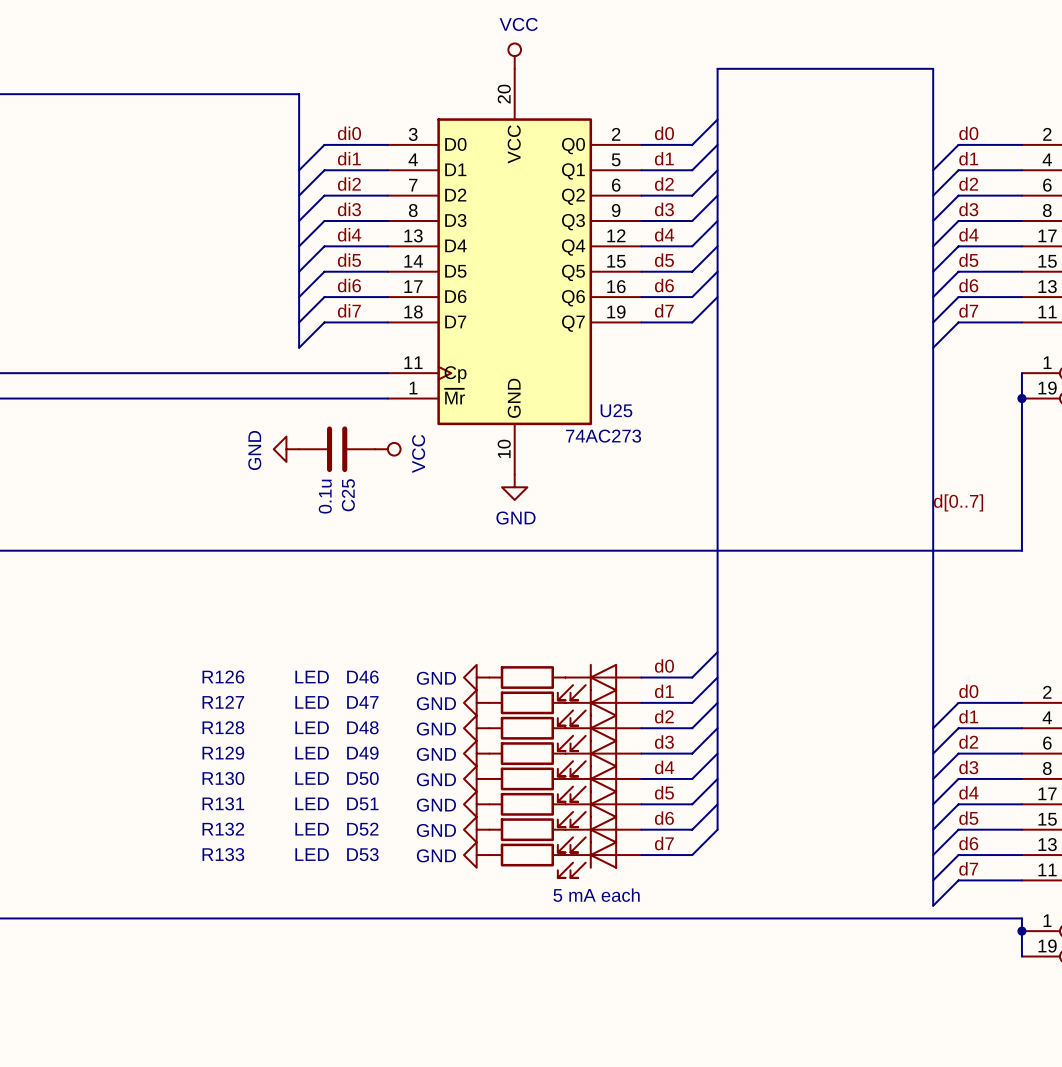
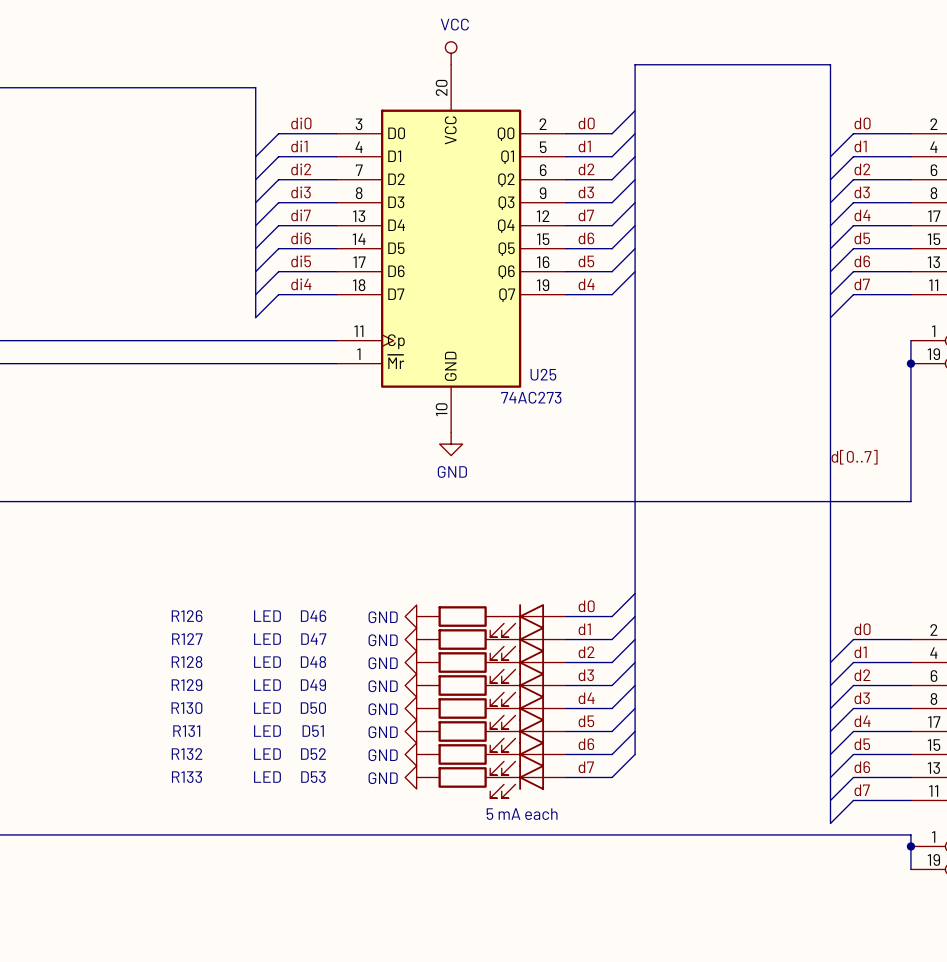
label: di4 (349, 234) -> di7 (301, 215)
label: d4 (664, 234) -> d7 (586, 215)
label: di5 (349, 260) -> di6 (301, 238)
label: d5 (664, 260) -> d6 (586, 238)
label: di6 (349, 285) -> di5 (301, 261)
label: d6 (664, 285) -> d5 (586, 261)
label: di7 (349, 310) -> di4 (301, 284)
label: d7 (664, 310) -> d4 (586, 284)
power symbol: GND (286, 449) -> none
C25: 0.1u (337, 449) -> none
power symbol: VCC (387, 449) -> none

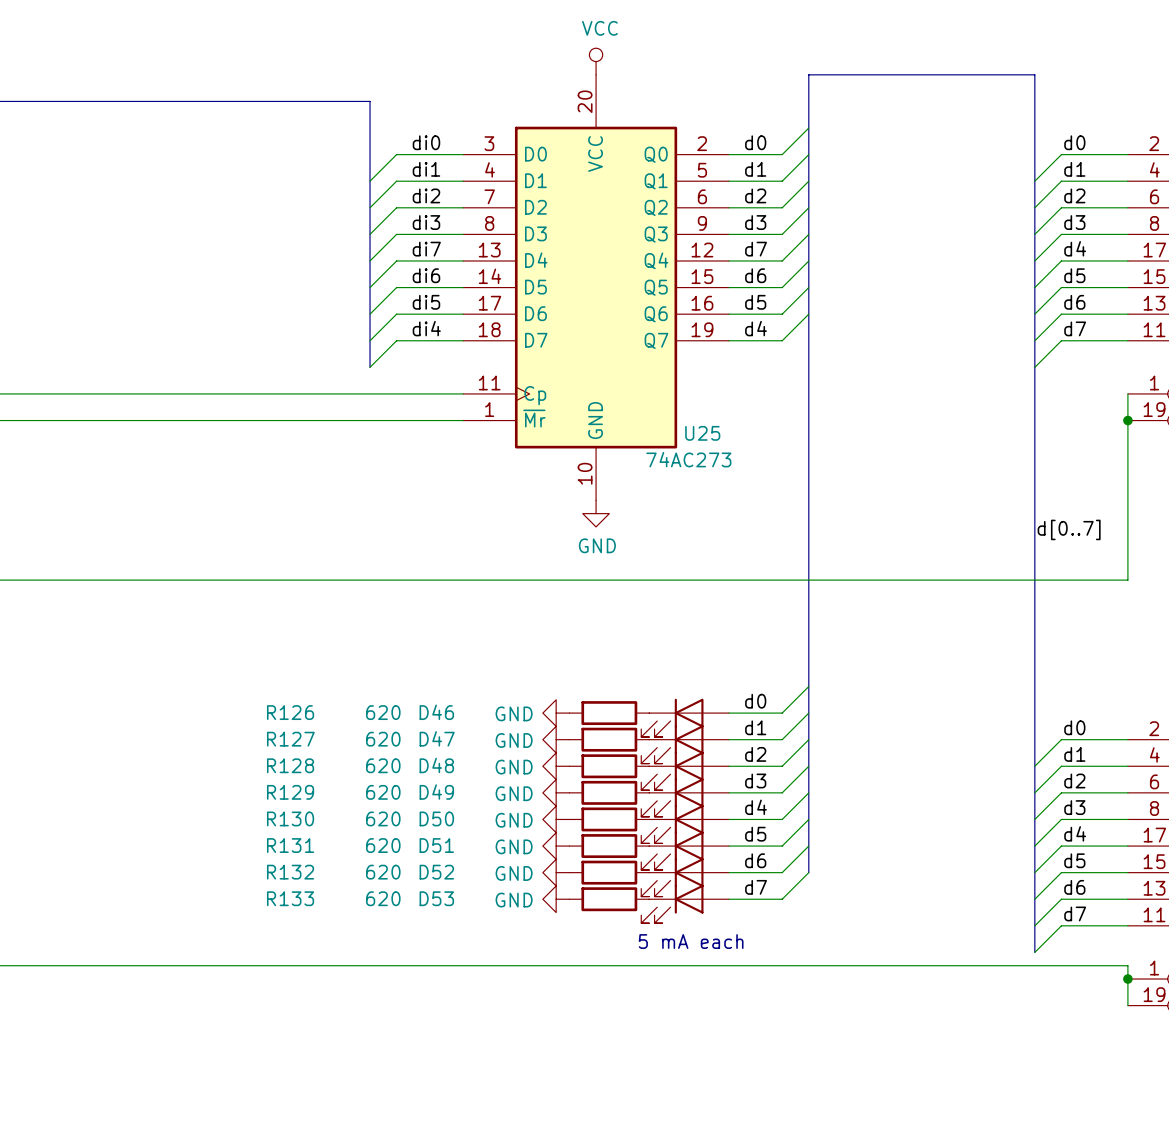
R126 value: LED (267, 616) -> 620 (383, 712)
R127 value: LED (267, 639) -> 620 (383, 739)
R128 value: LED (267, 662) -> 620 (383, 765)
R129 value: LED (267, 685) -> 620 (383, 792)
R130 value: LED (267, 708) -> 620 (383, 818)
R131 value: LED (267, 731) -> 620 (383, 845)
R132 value: LED (267, 754) -> 620 (383, 872)
R133 value: LED (267, 777) -> 620 (383, 898)

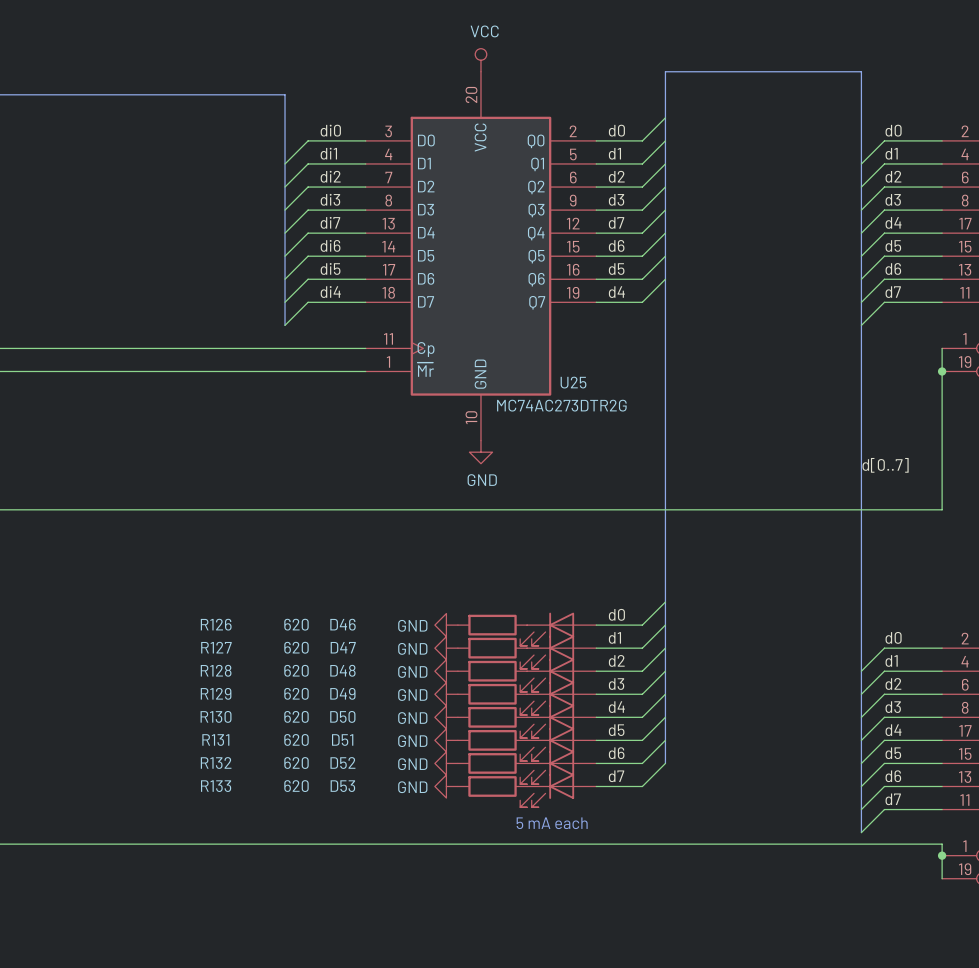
U25 value: 74AC273 (688, 459) -> MC74AC273DTR2G (561, 405)

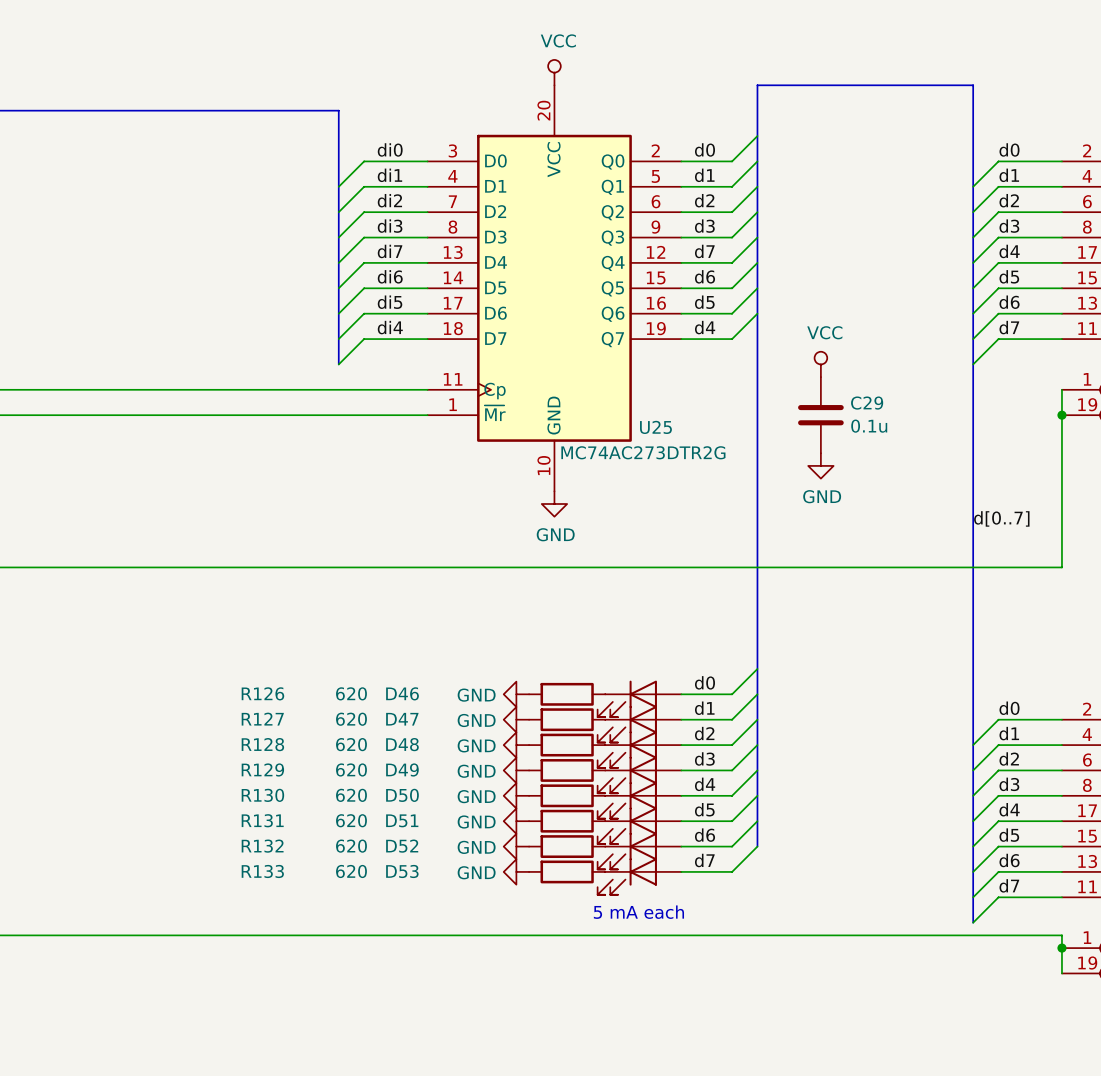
power symbol: none -> VCC (820, 364)
C29: none -> 0.1u (820, 415)
power symbol: none -> GND (820, 465)

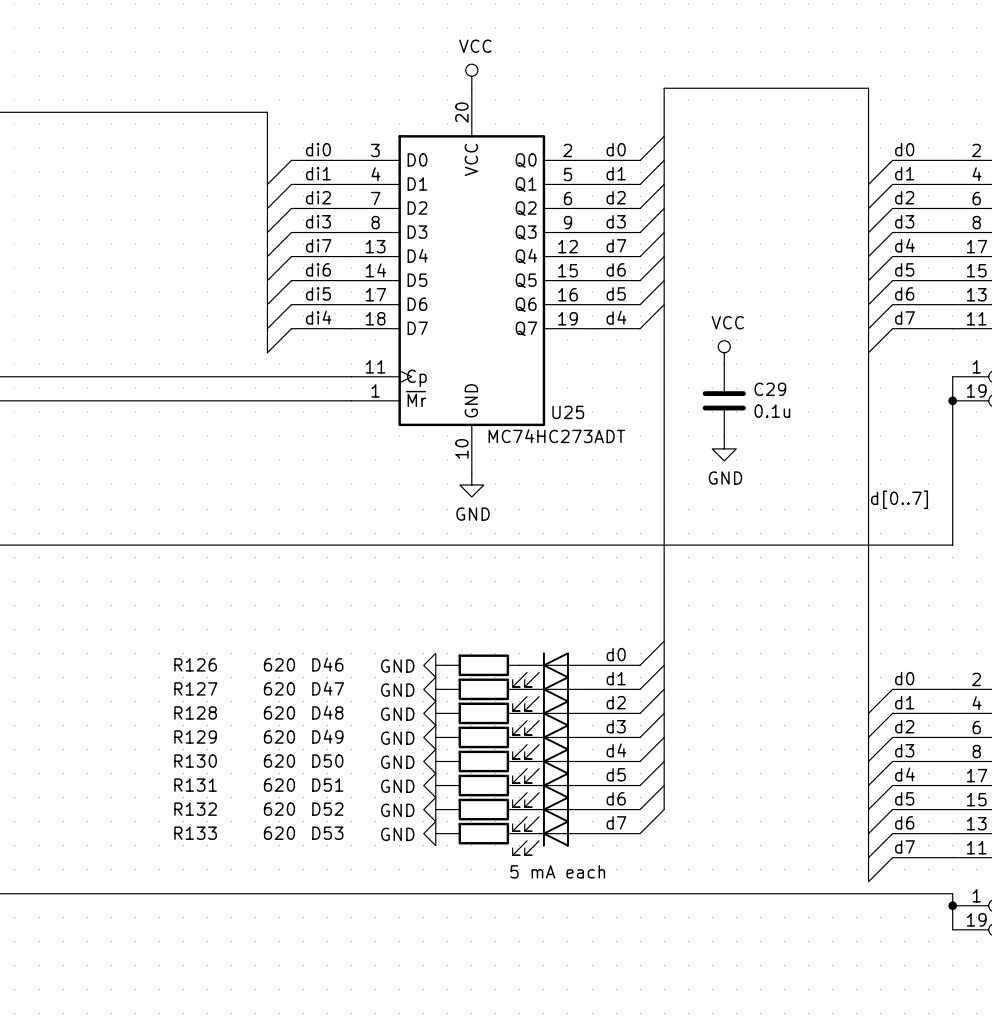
U25 value: MC74AC273DTR2G (643, 452) -> MC74HC273ADT (556, 436)

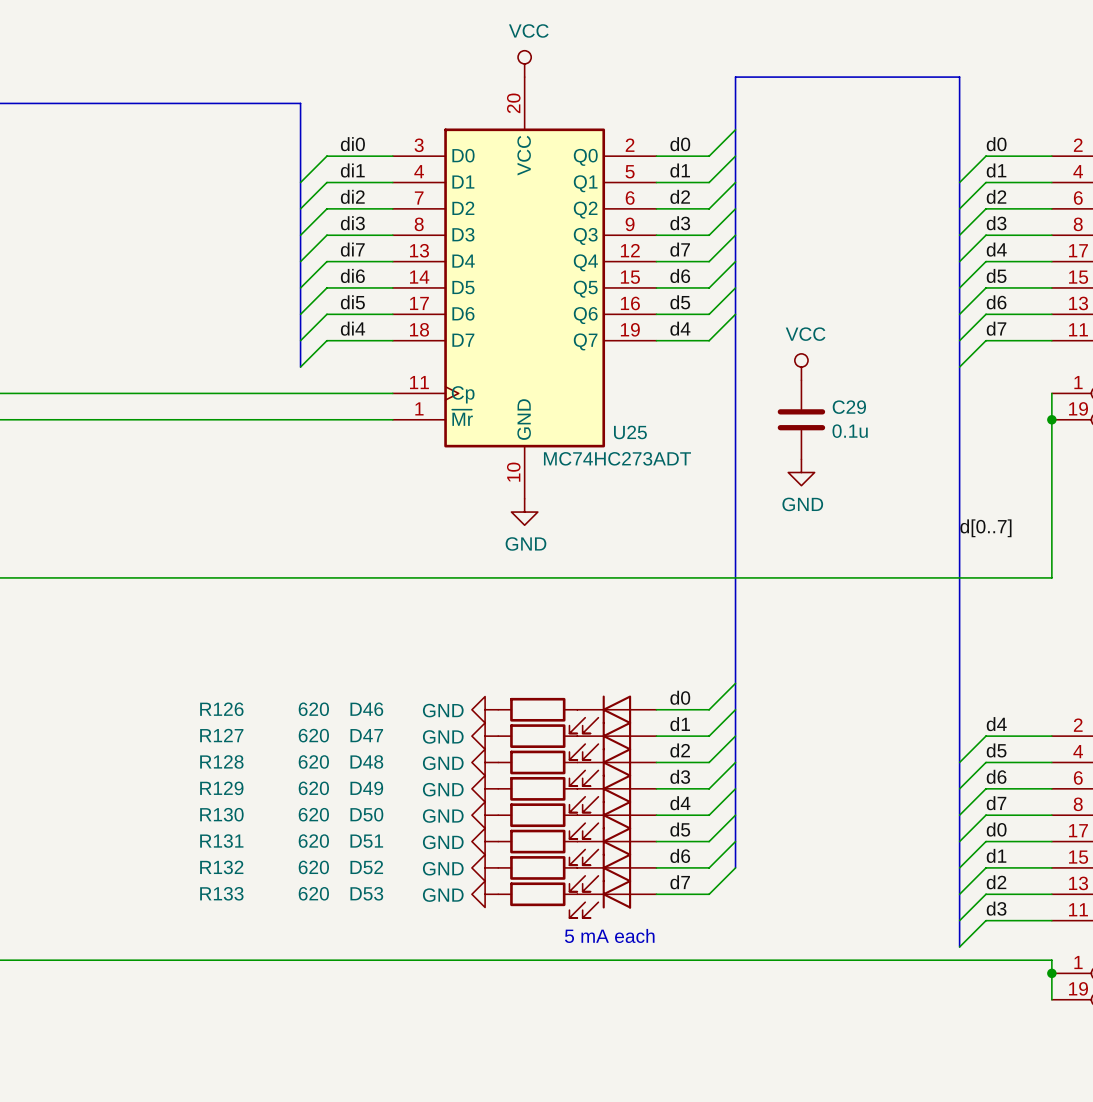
label: d0 (904, 678) -> d4 (996, 724)
label: d1 (904, 702) -> d5 (996, 750)
label: d2 (904, 726) -> d6 (996, 776)
label: d3 (904, 750) -> d7 (996, 803)
label: d4 (904, 774) -> d0 (996, 829)
label: d5 (904, 798) -> d1 (996, 855)
label: d6 (904, 822) -> d2 (996, 882)
label: d7 (904, 846) -> d3 (996, 908)

